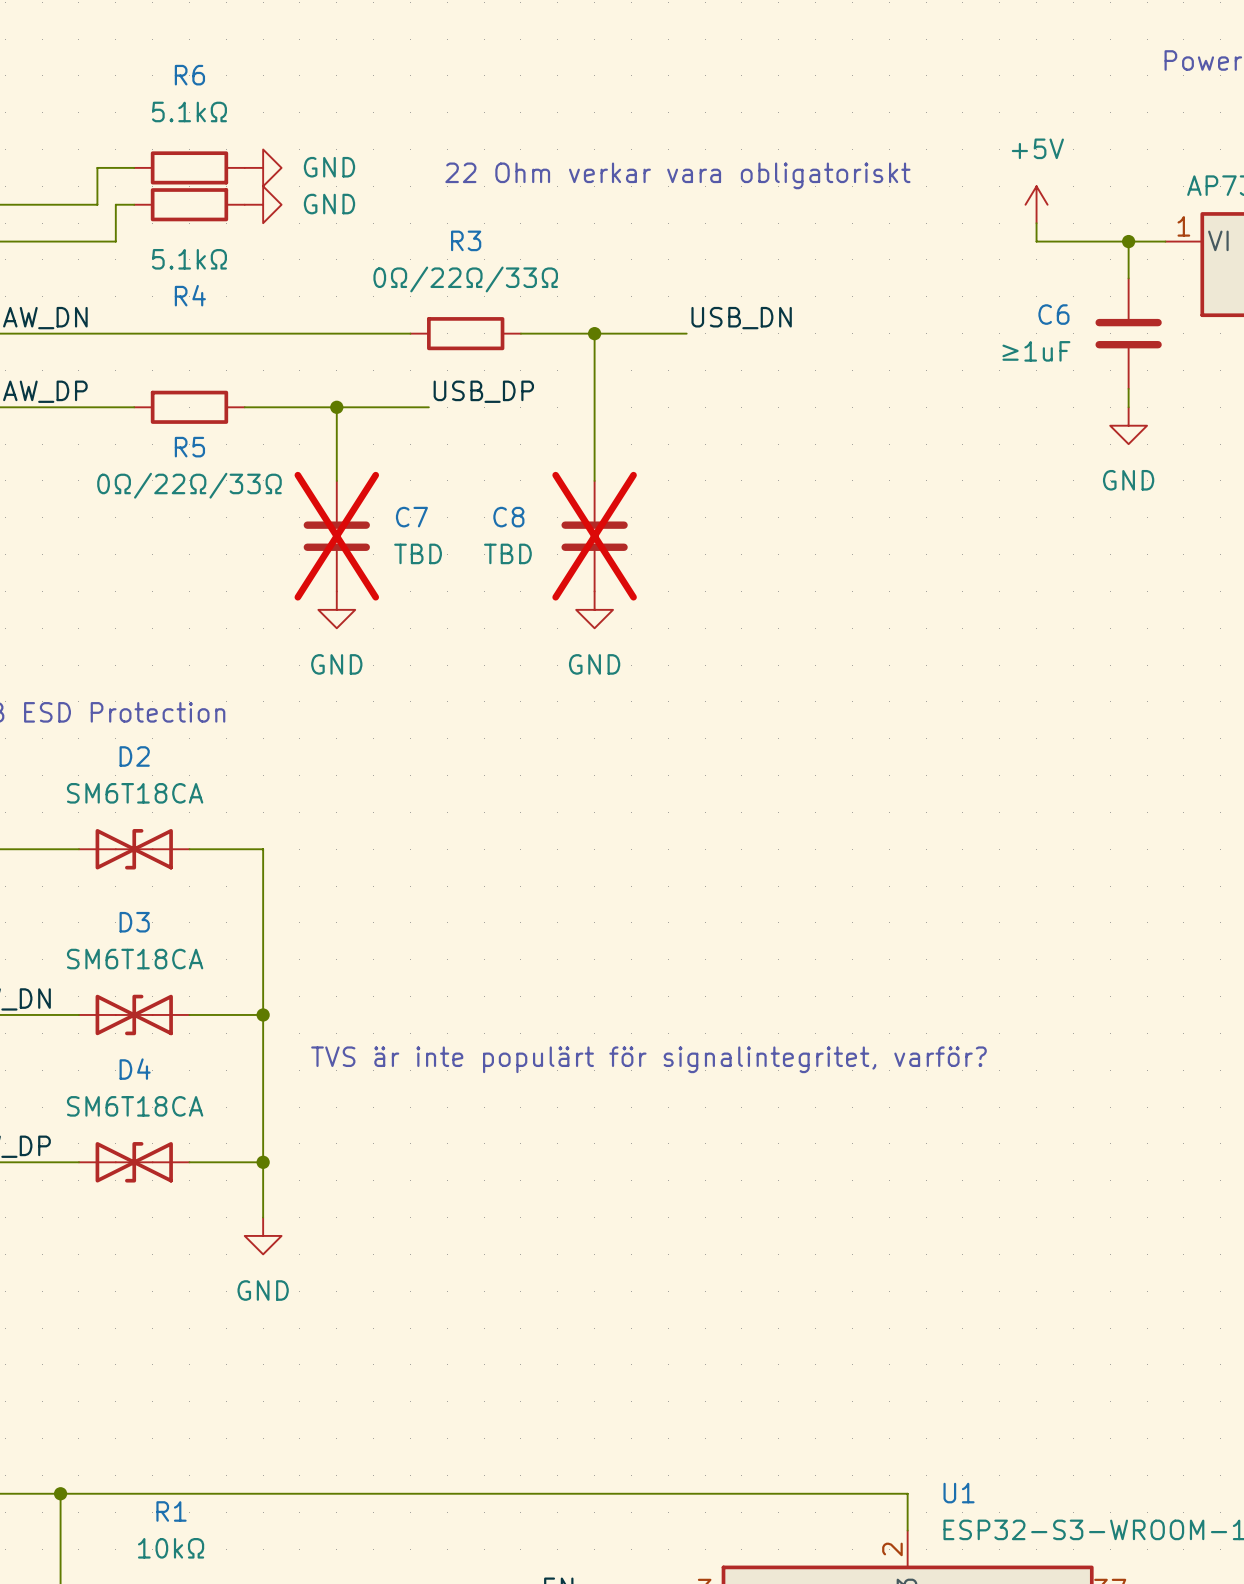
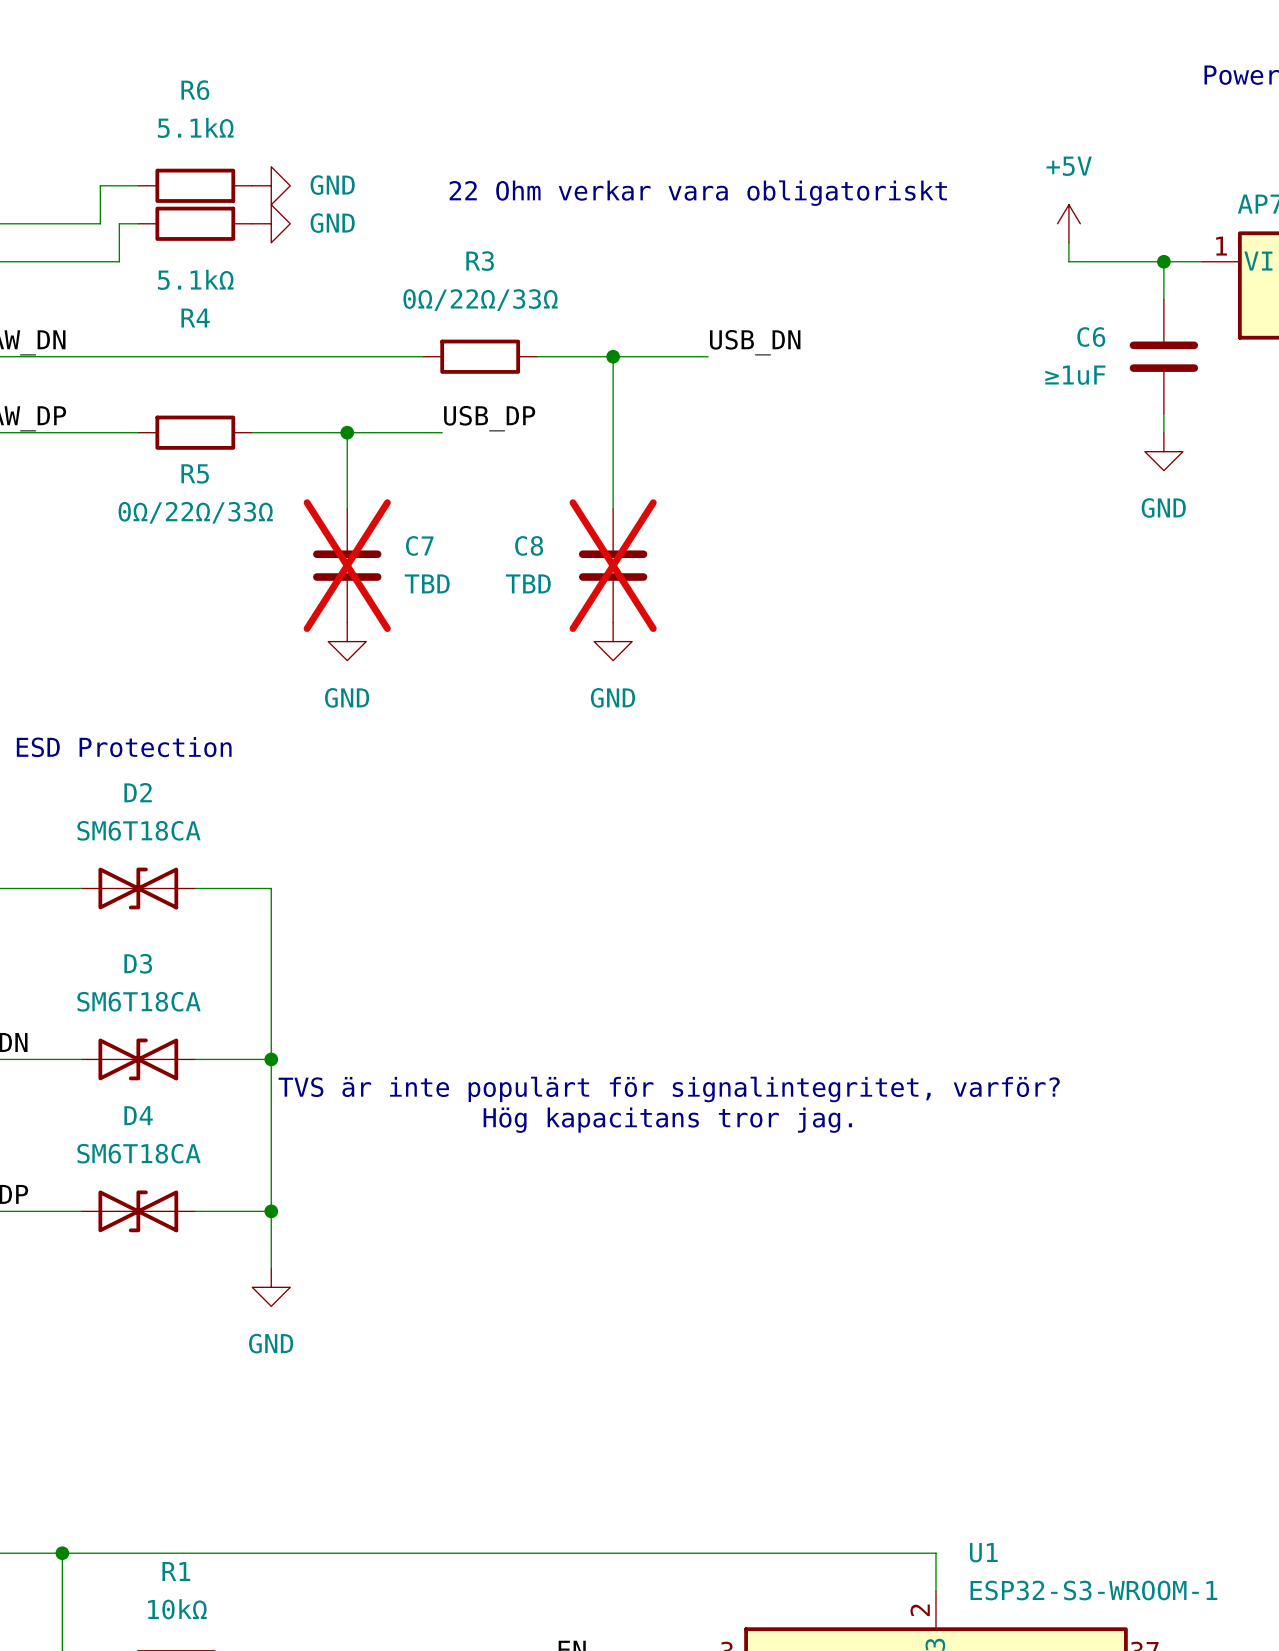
text position: TVS är inte populärt för signalintegritet, varför? (648, 1059) -> TVS är inte populärt för signalintegritet, varför? (669, 1089)
text: none -> Hög kapacitans tror jag. (667, 1120)

